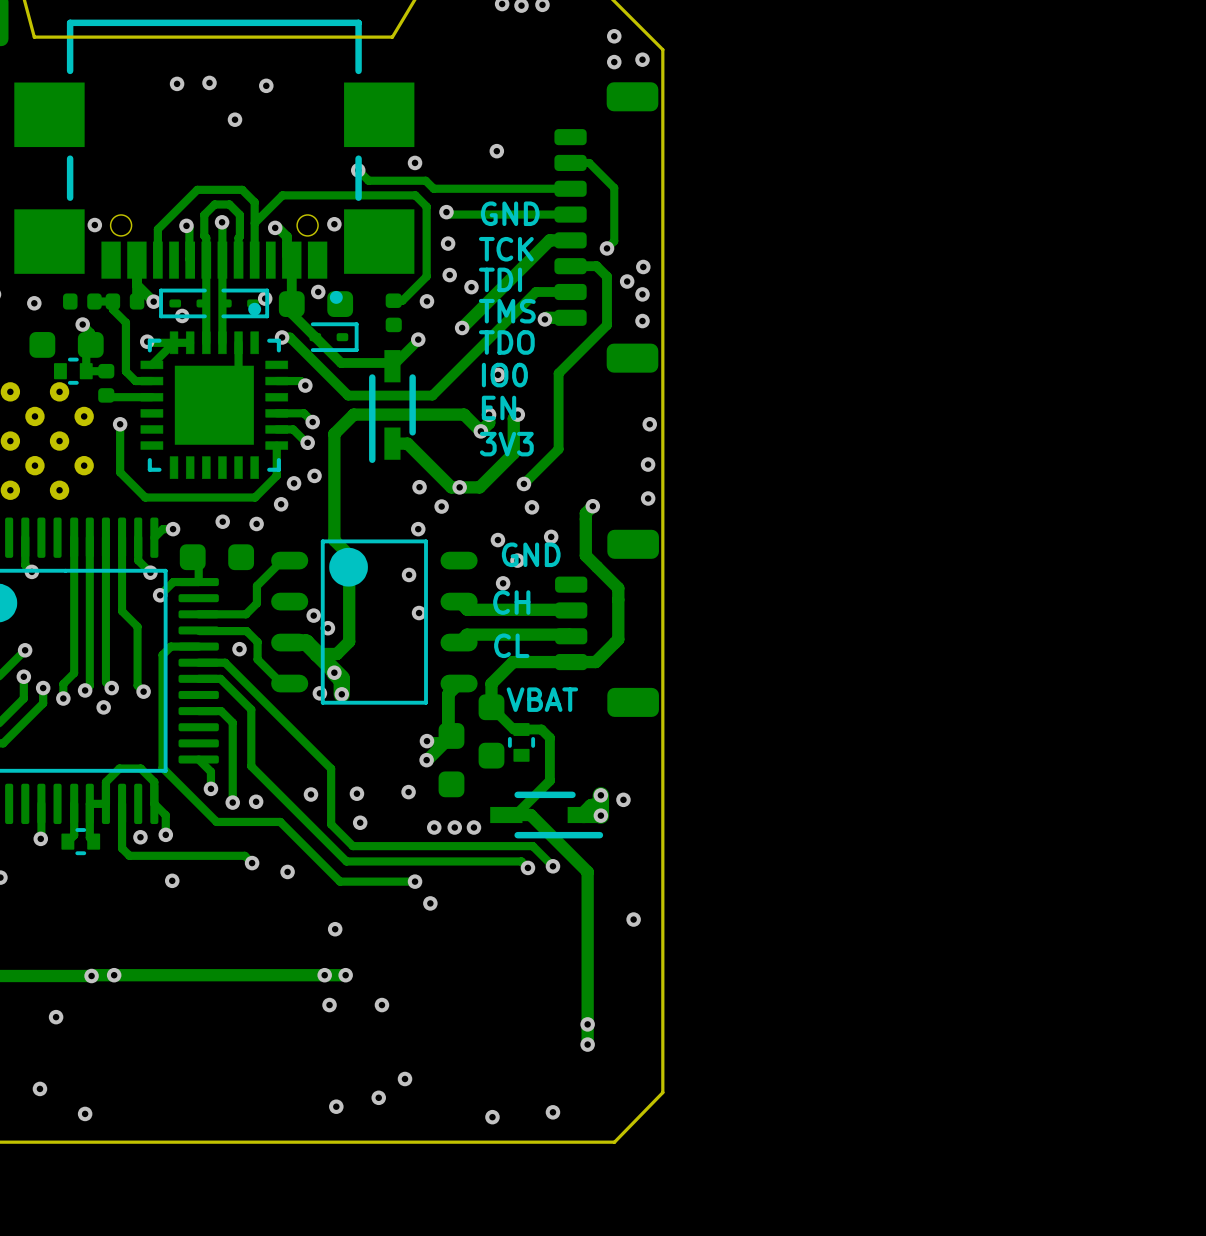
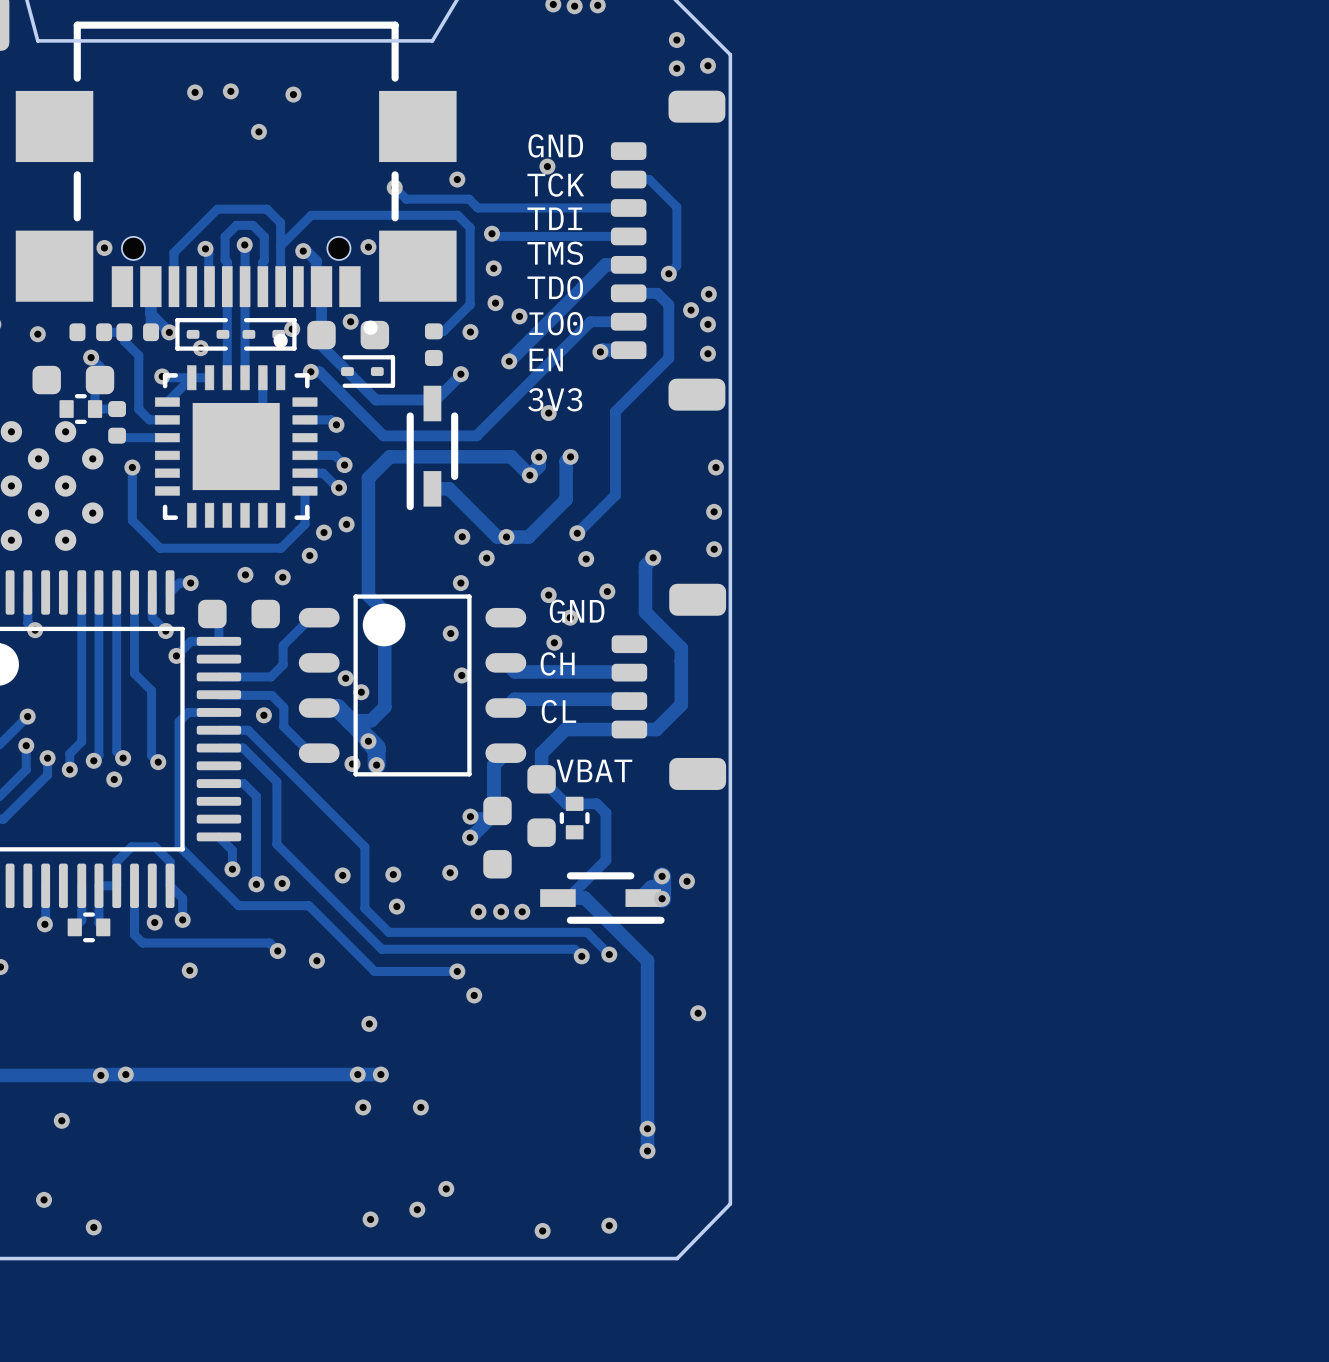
text position: GND (510, 213) -> GND (555, 145)
text position: TCK (506, 249) -> TCK (555, 185)
text position: TDI (500, 279) -> TDI (554, 218)
text position: TMS (507, 311) -> TMS (555, 253)
text position: TDO (506, 342) -> TDO (555, 287)
text position: IO0 (504, 375) -> IO0 (556, 323)
text position: EN (499, 407) -> EN (546, 359)
text position: 3V3 (506, 444) -> 3V3 (555, 399)

